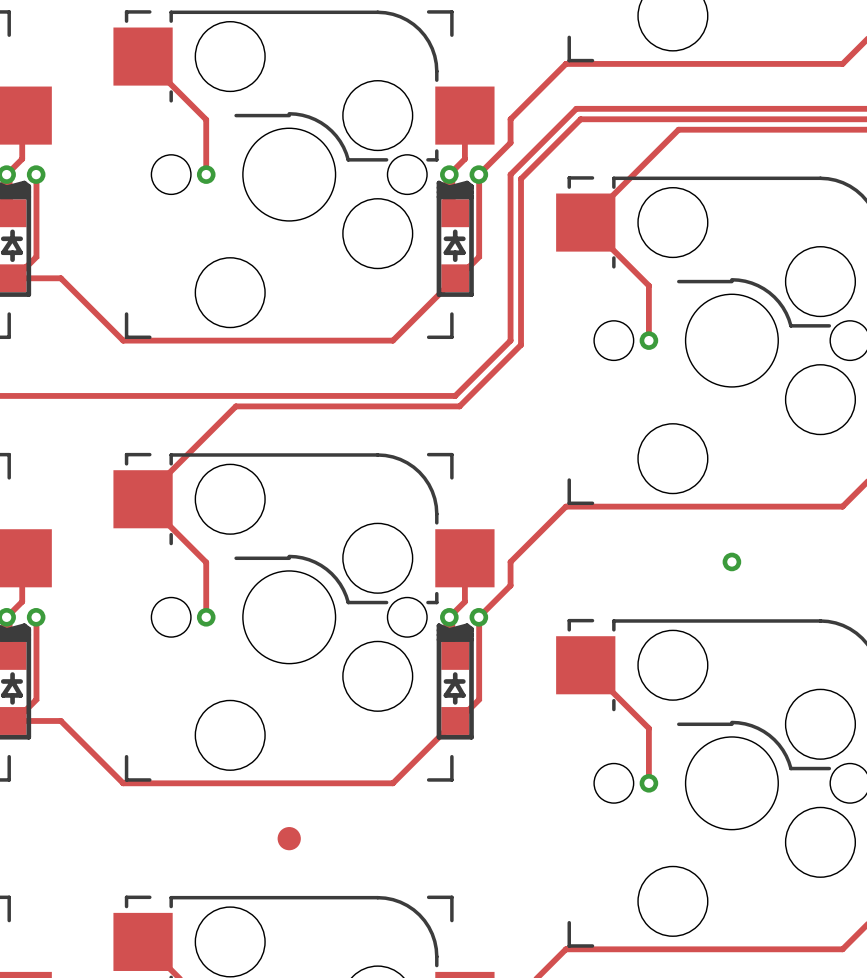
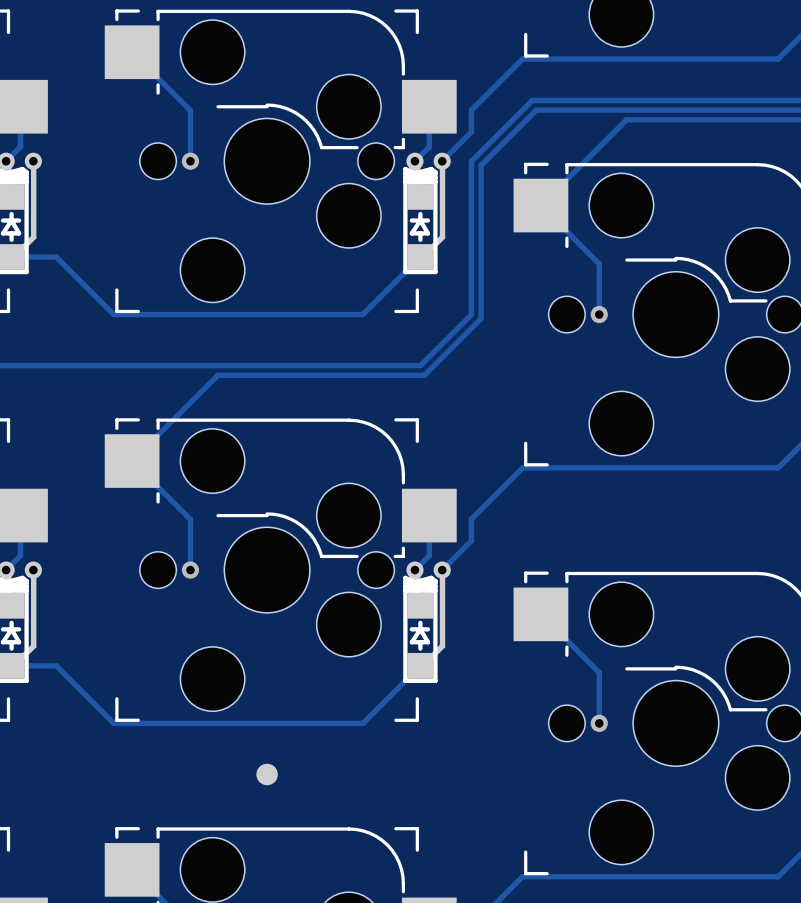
via: (731, 561) -> none

